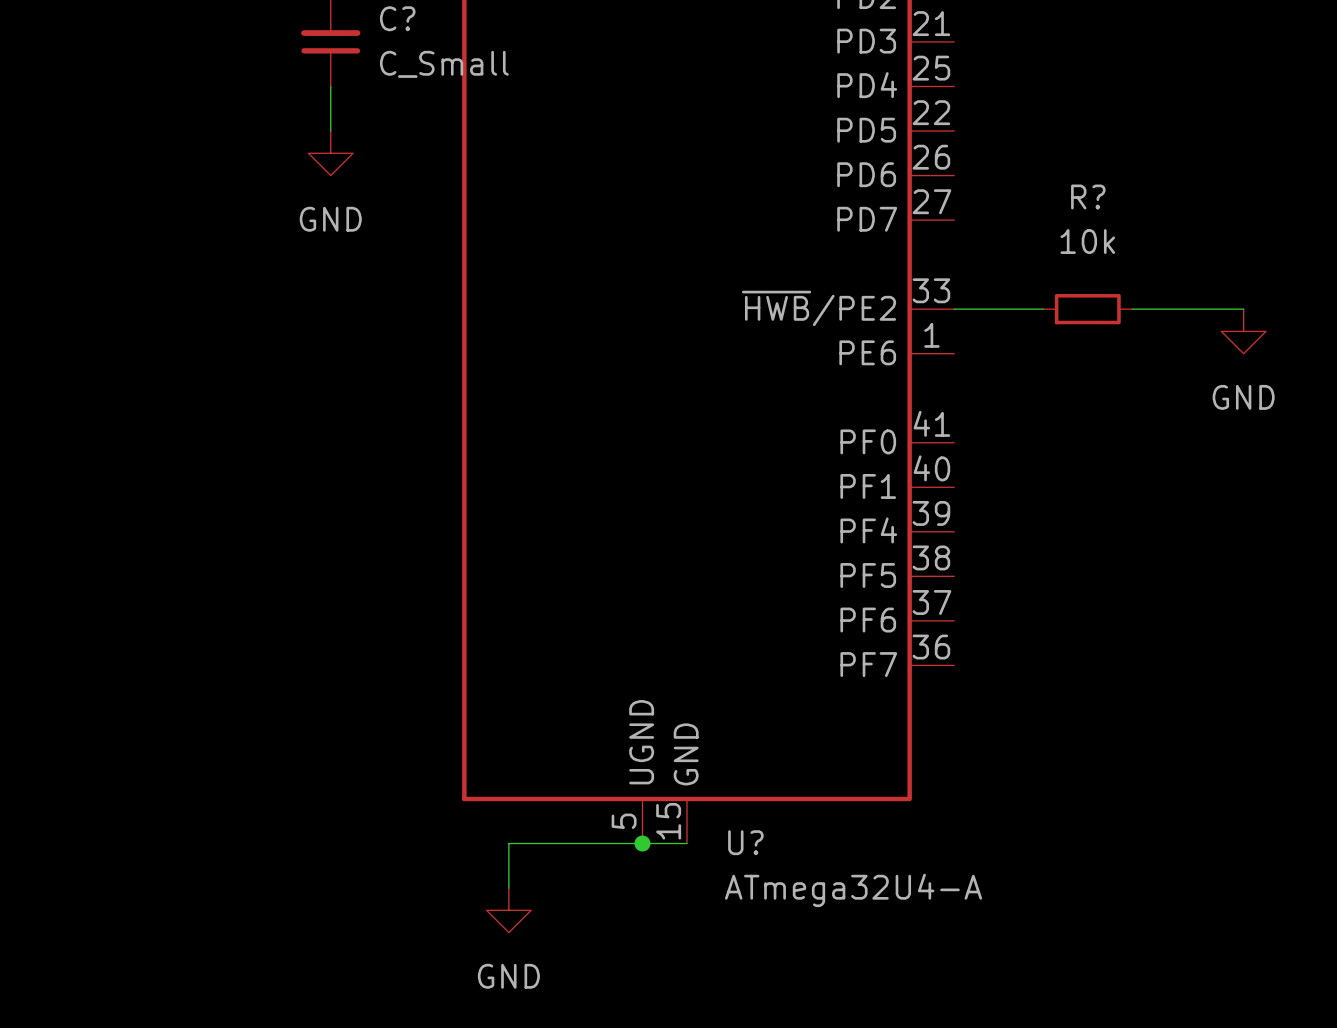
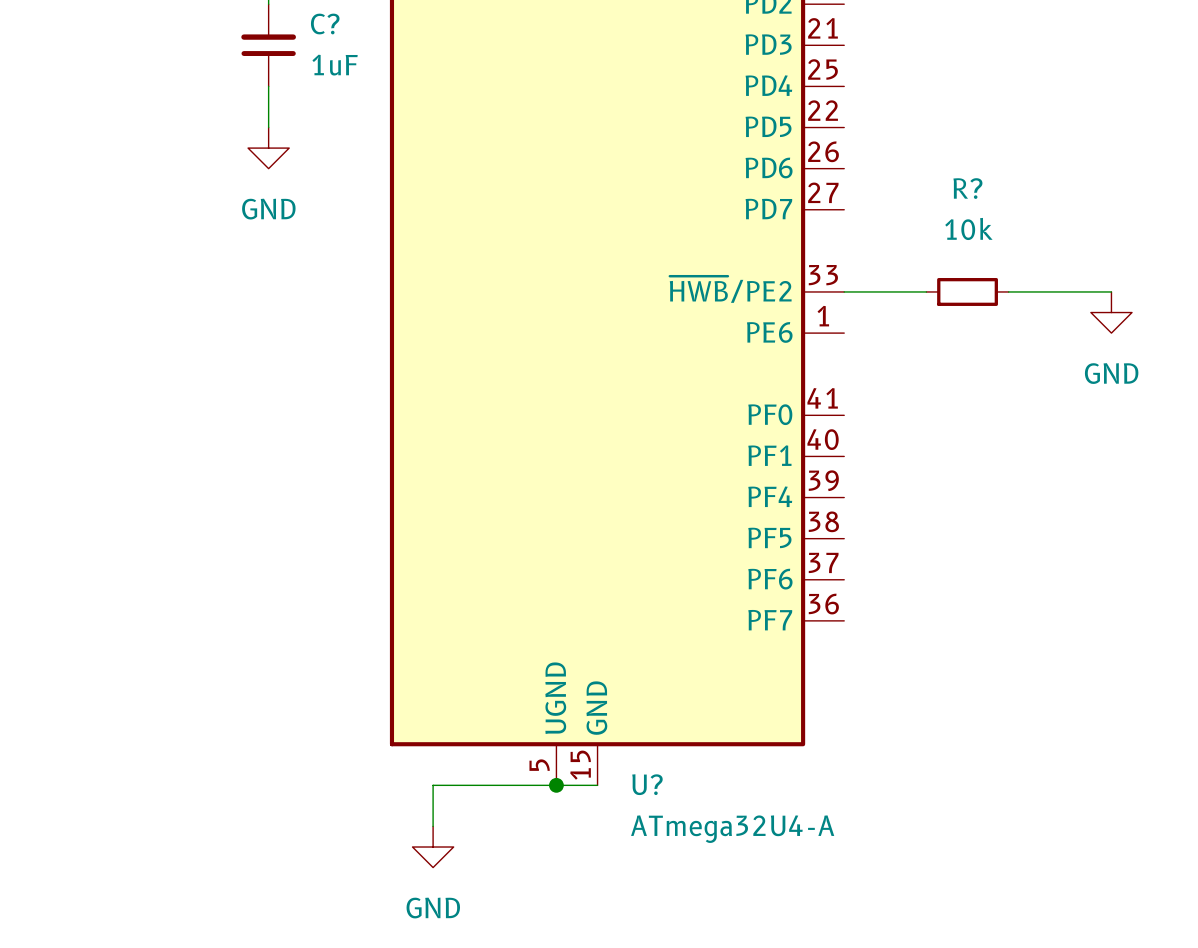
C? value: C_Small (444, 64) -> 1uF (335, 65)

